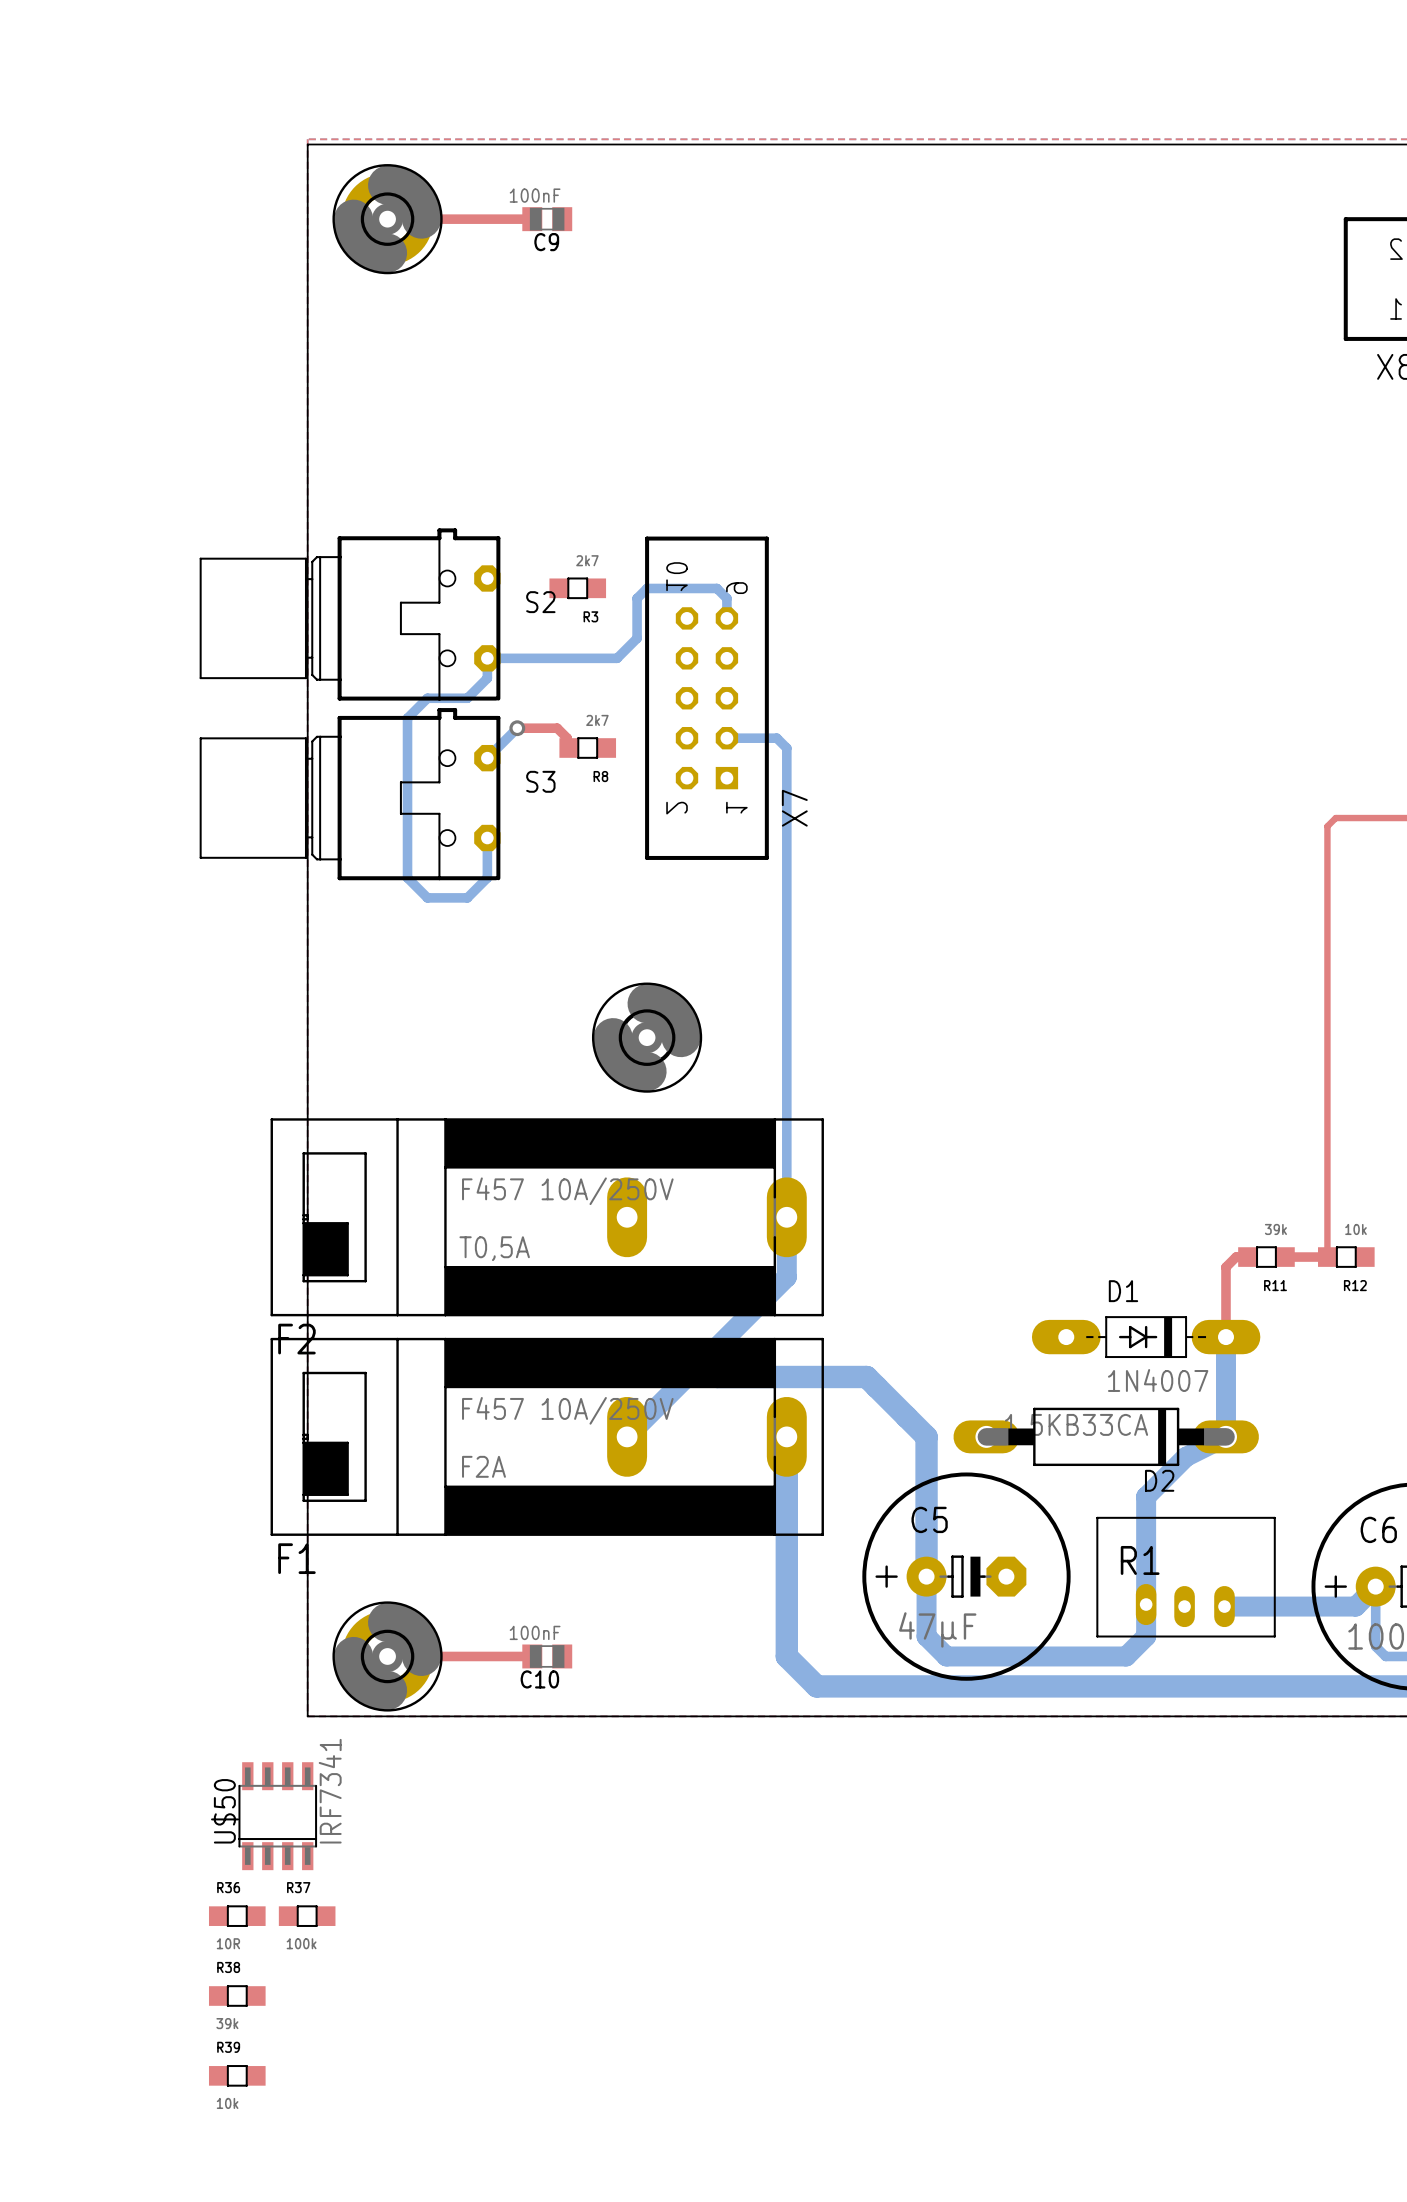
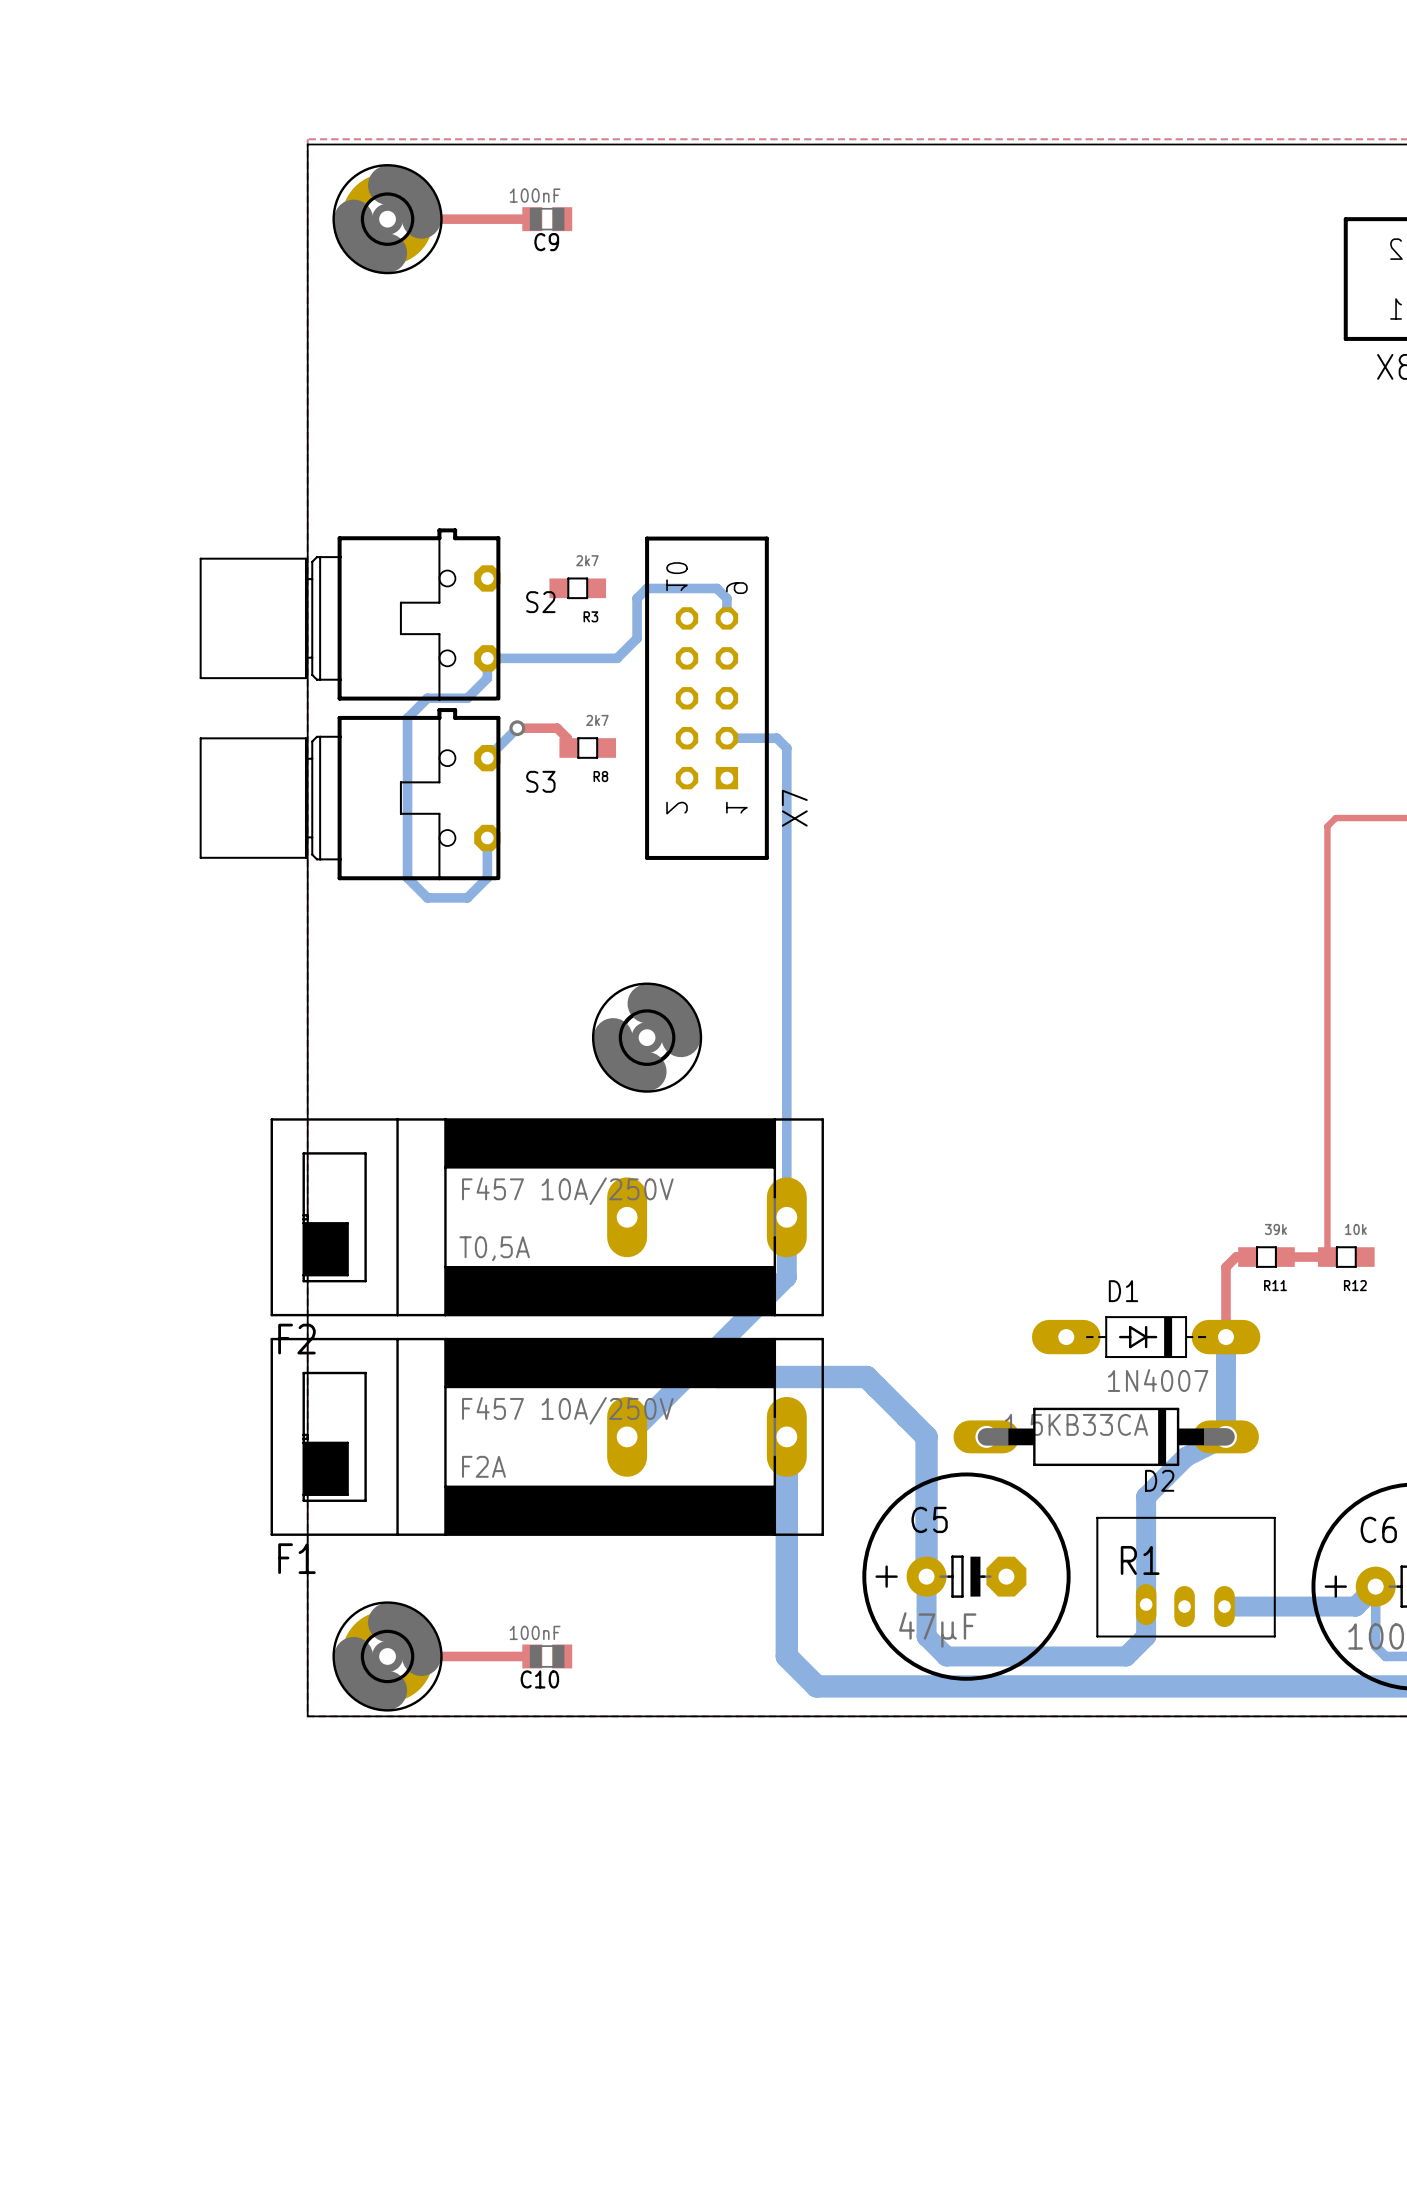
U$50: IRF7341 (277, 1816) -> none
R36: 10R (237, 1916) -> none
R37: 100k (307, 1916) -> none
R38: 39k (237, 1995) -> none
R39: 10k (237, 2075) -> none

